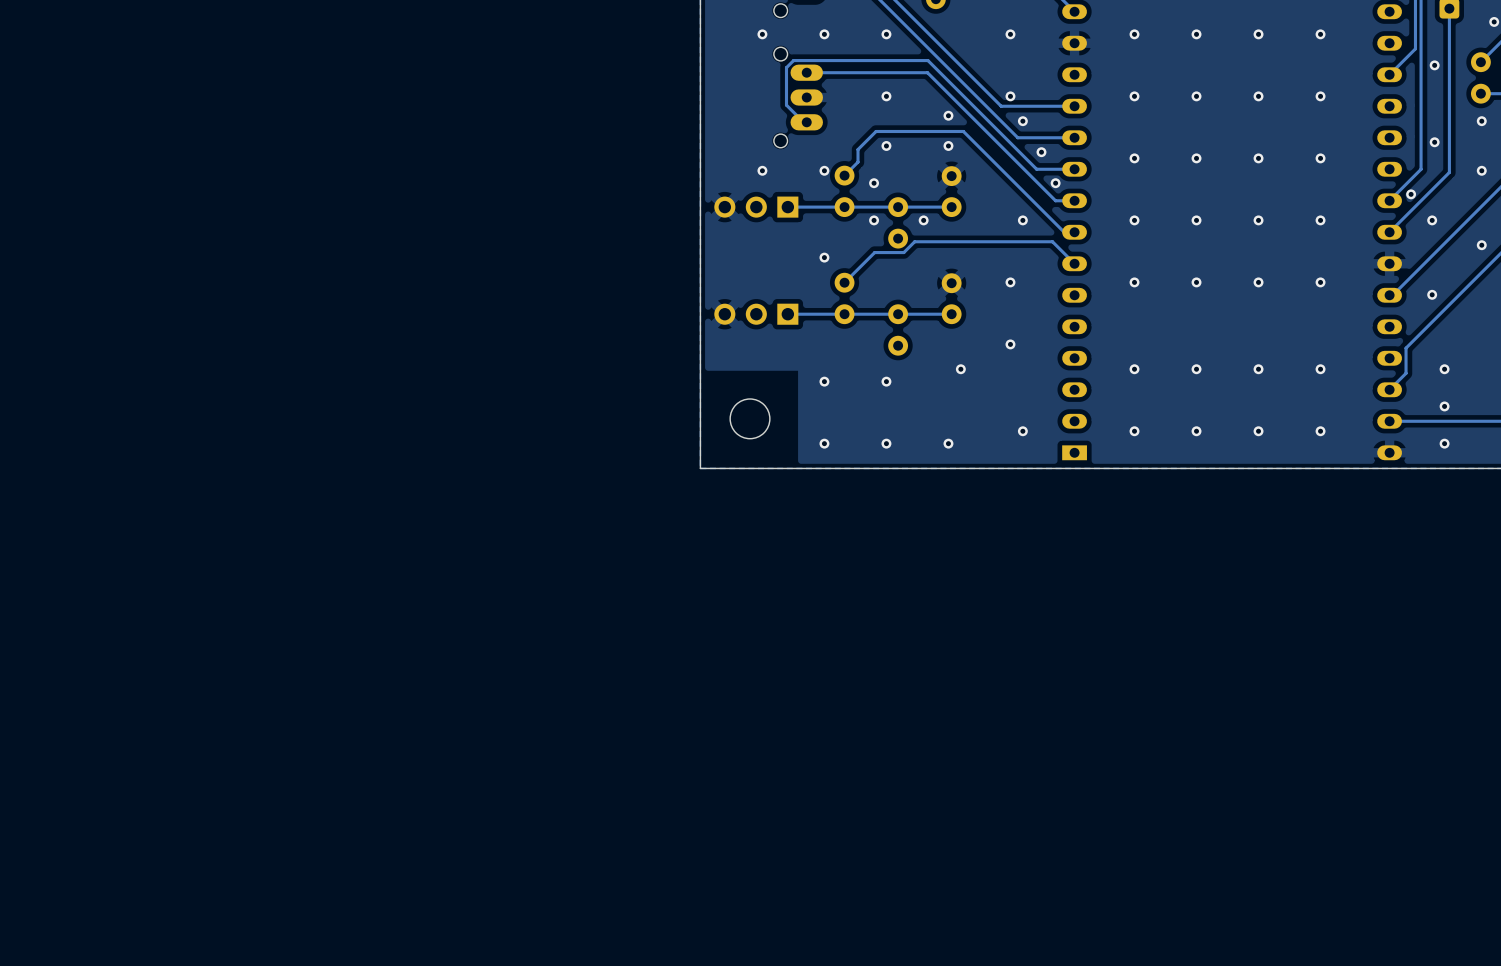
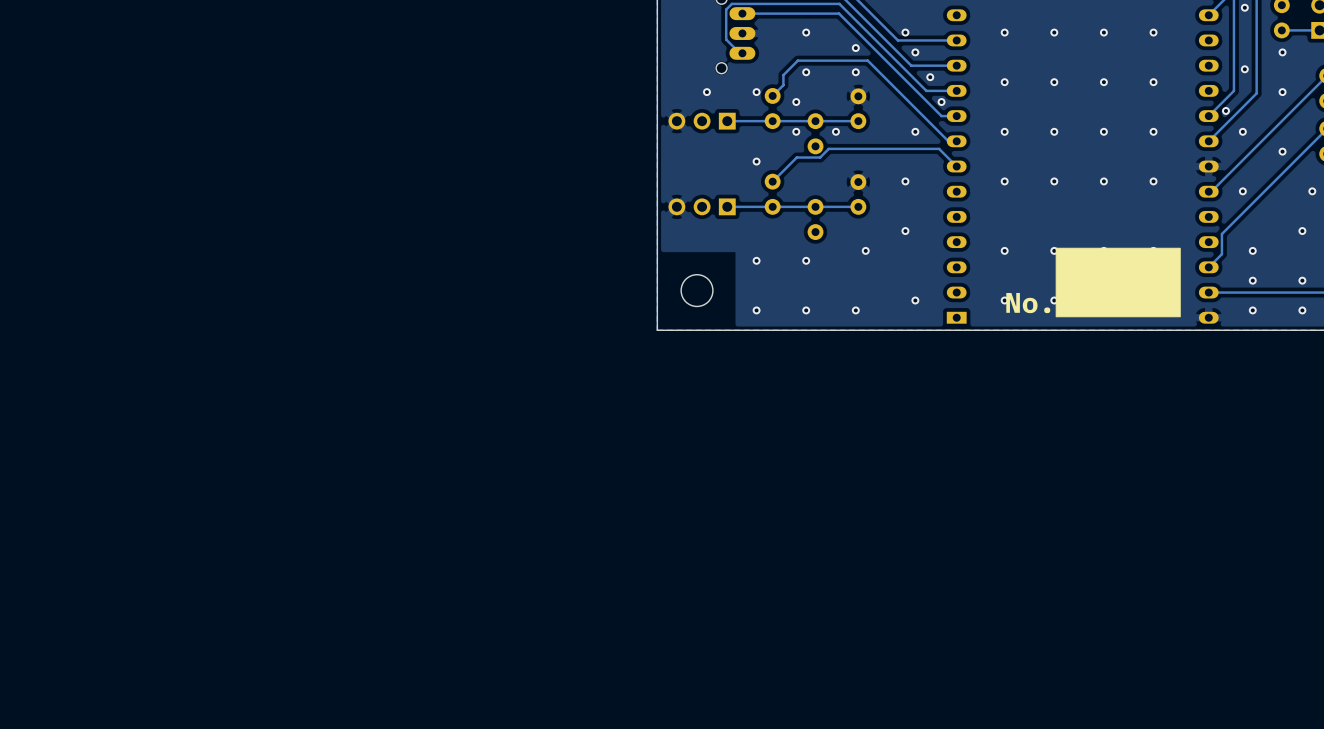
drawing: none -> [1055, 247, 1181, 318]
text: none -> No. (1028, 303)

